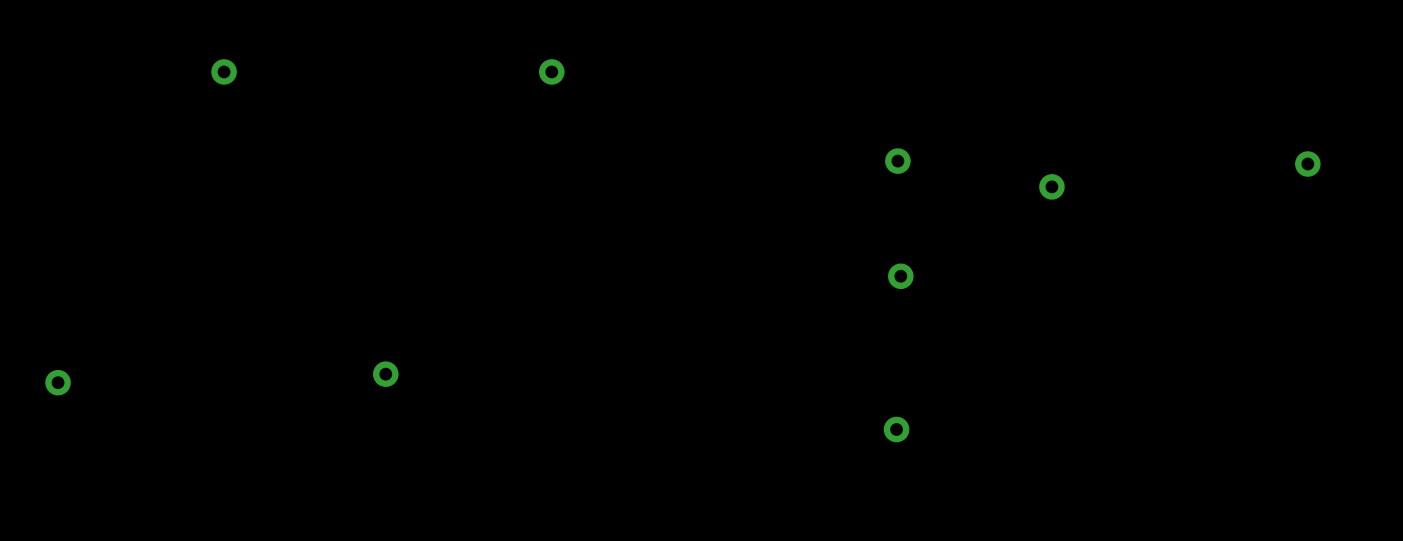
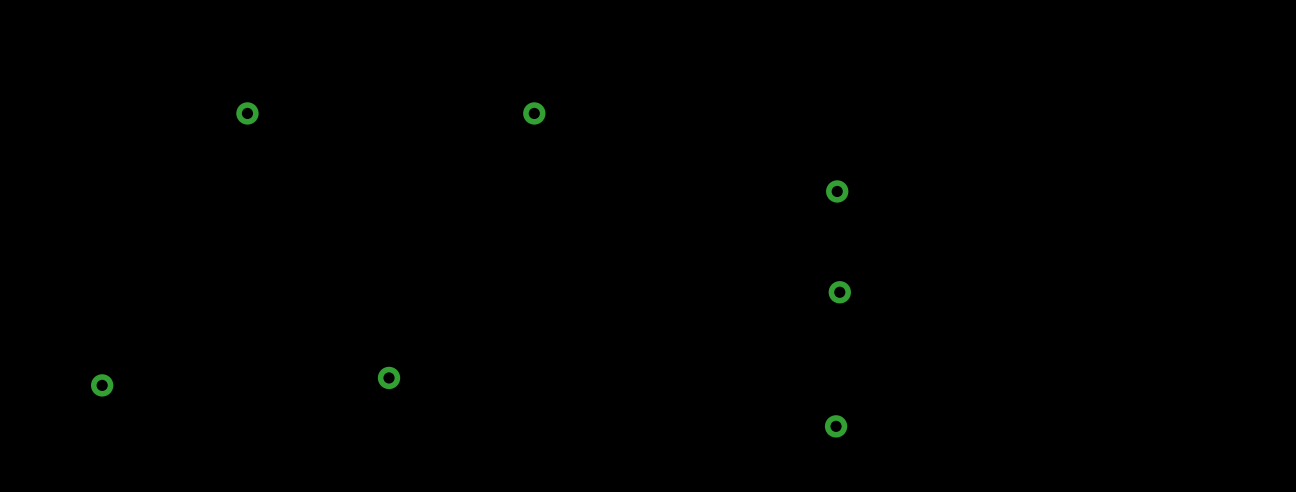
via: (1307, 164) -> none
via: (1051, 186) -> none

